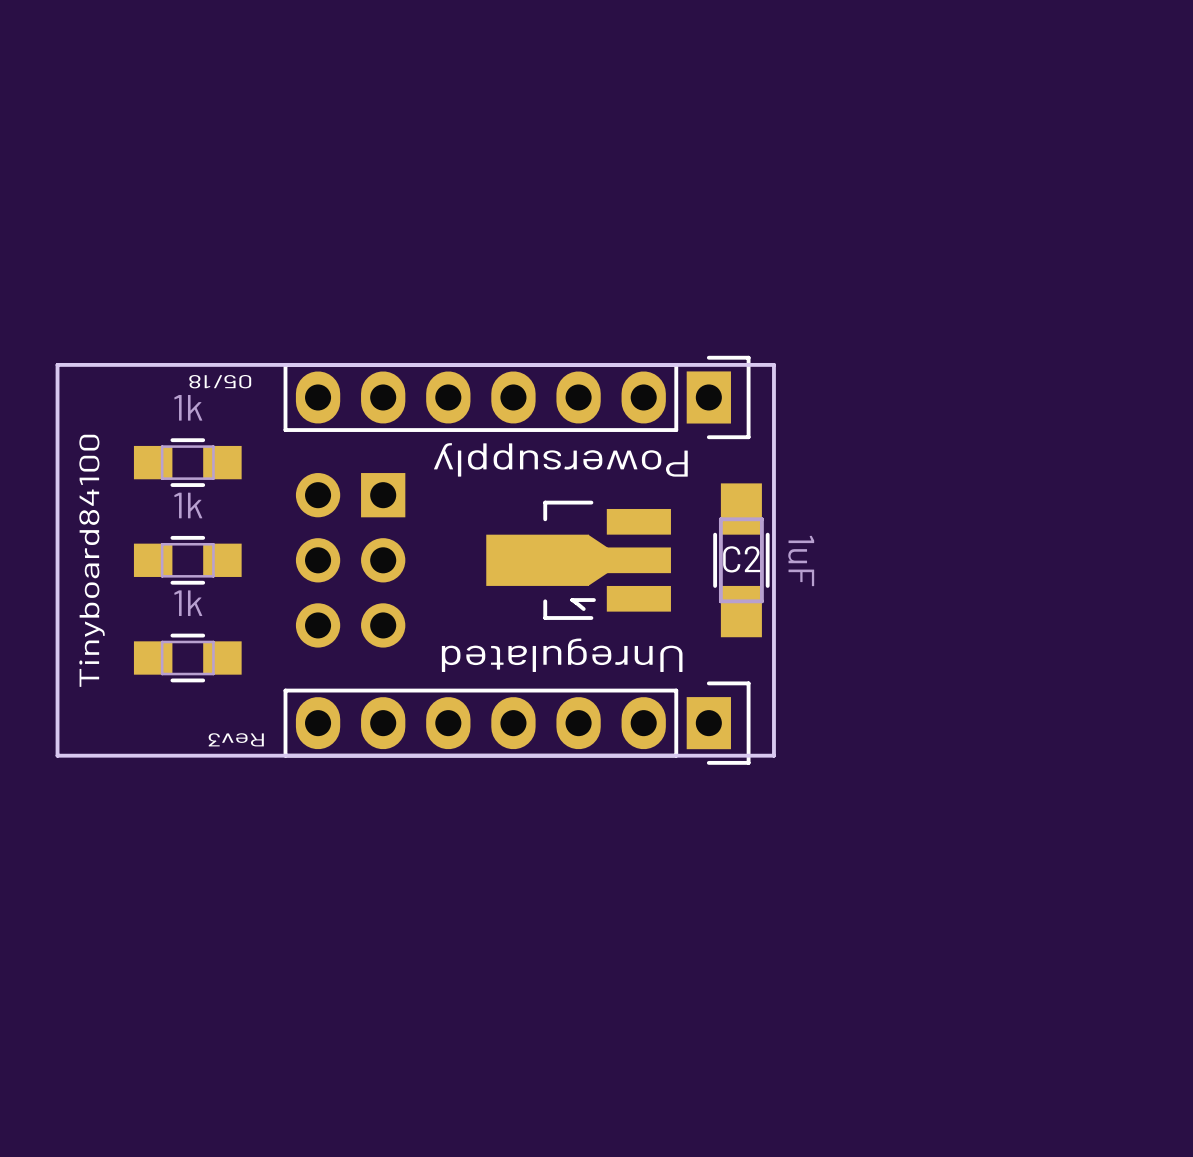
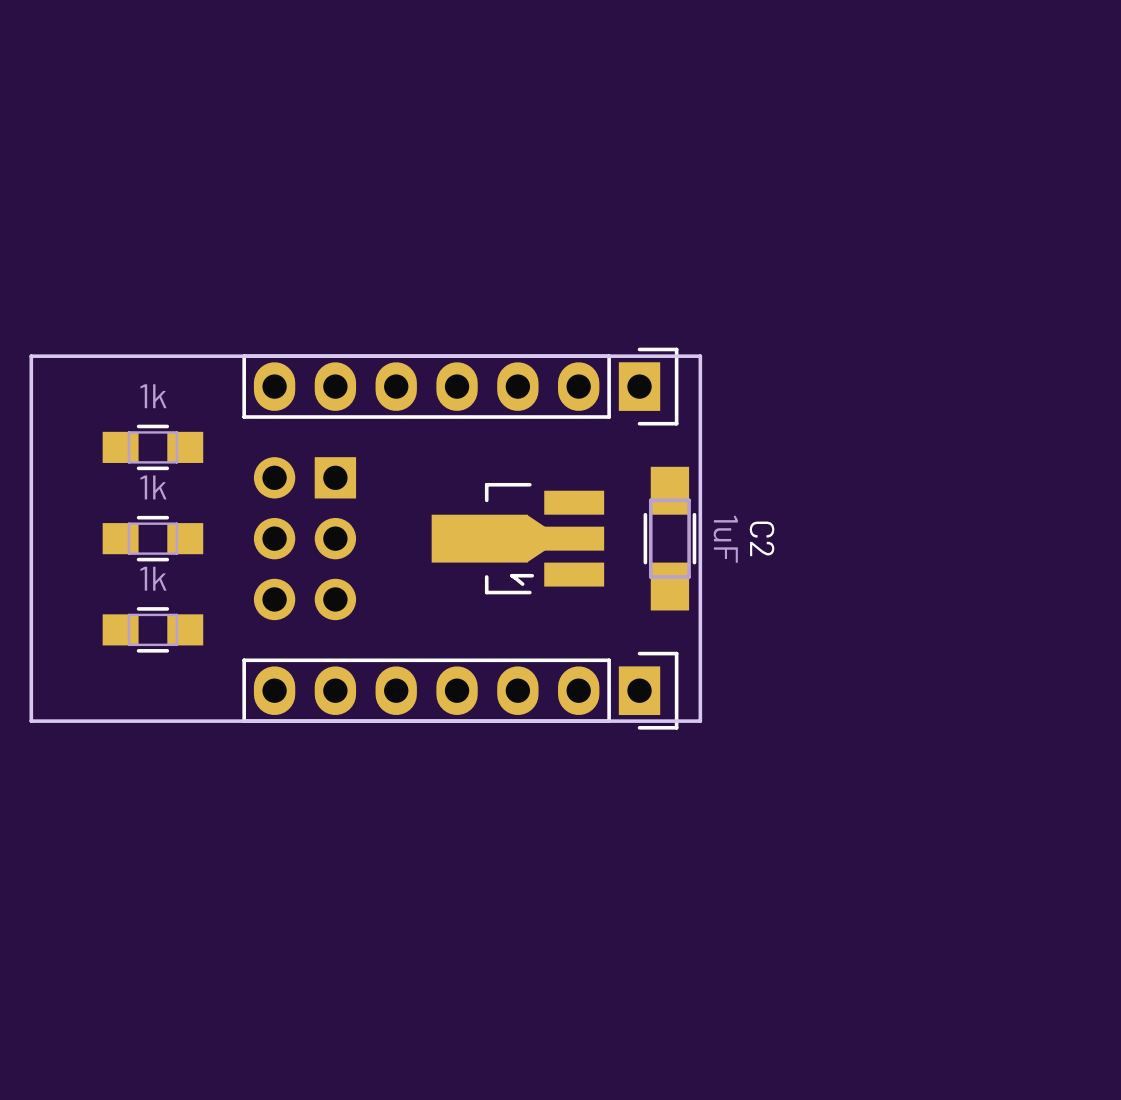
text: 05/18 (220, 381) -> none
text: Powersupply (560, 459) -> none
C2 name rotation: 0° (741, 559) -> 90° clockwise (762, 538)
C2 name position: C2 (741, 559) -> C2 (762, 538)
text: Tinyboard84100 (92, 560) -> none
text: Unregulated (562, 655) -> none
text: Rev3 (236, 739) -> none

